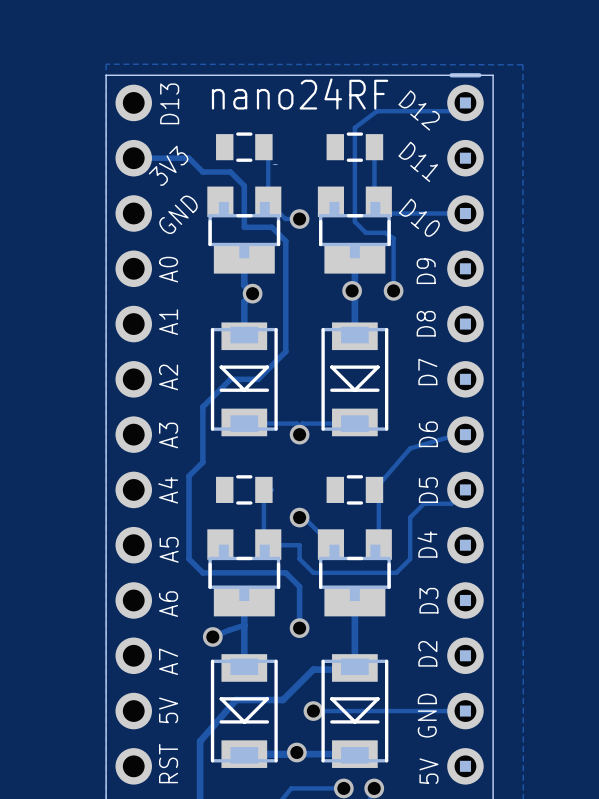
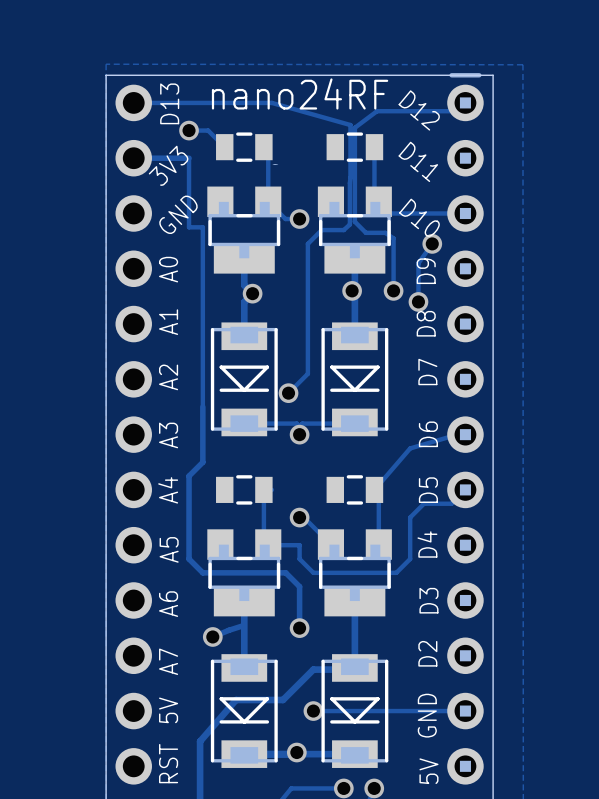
track: none -> (133, 102) (271, 102) (350, 125) (349, 224) (343, 230) (321, 230) (307, 243) (307, 373) (288, 393)
track: none -> (189, 130) (208, 130) (224, 147)
via: none -> (189, 130)
track: (189, 158) (202, 172) (230, 172) (244, 185) (244, 227) (271, 227) (285, 241) (285, 351) (258, 379) (230, 379) (202, 406) -> (189, 158) (189, 227) (202, 227) (202, 406)
track: none -> (432, 243) (418, 263) (418, 301)
via: none -> (432, 243)
via: none -> (418, 301)
via: none -> (288, 393)

